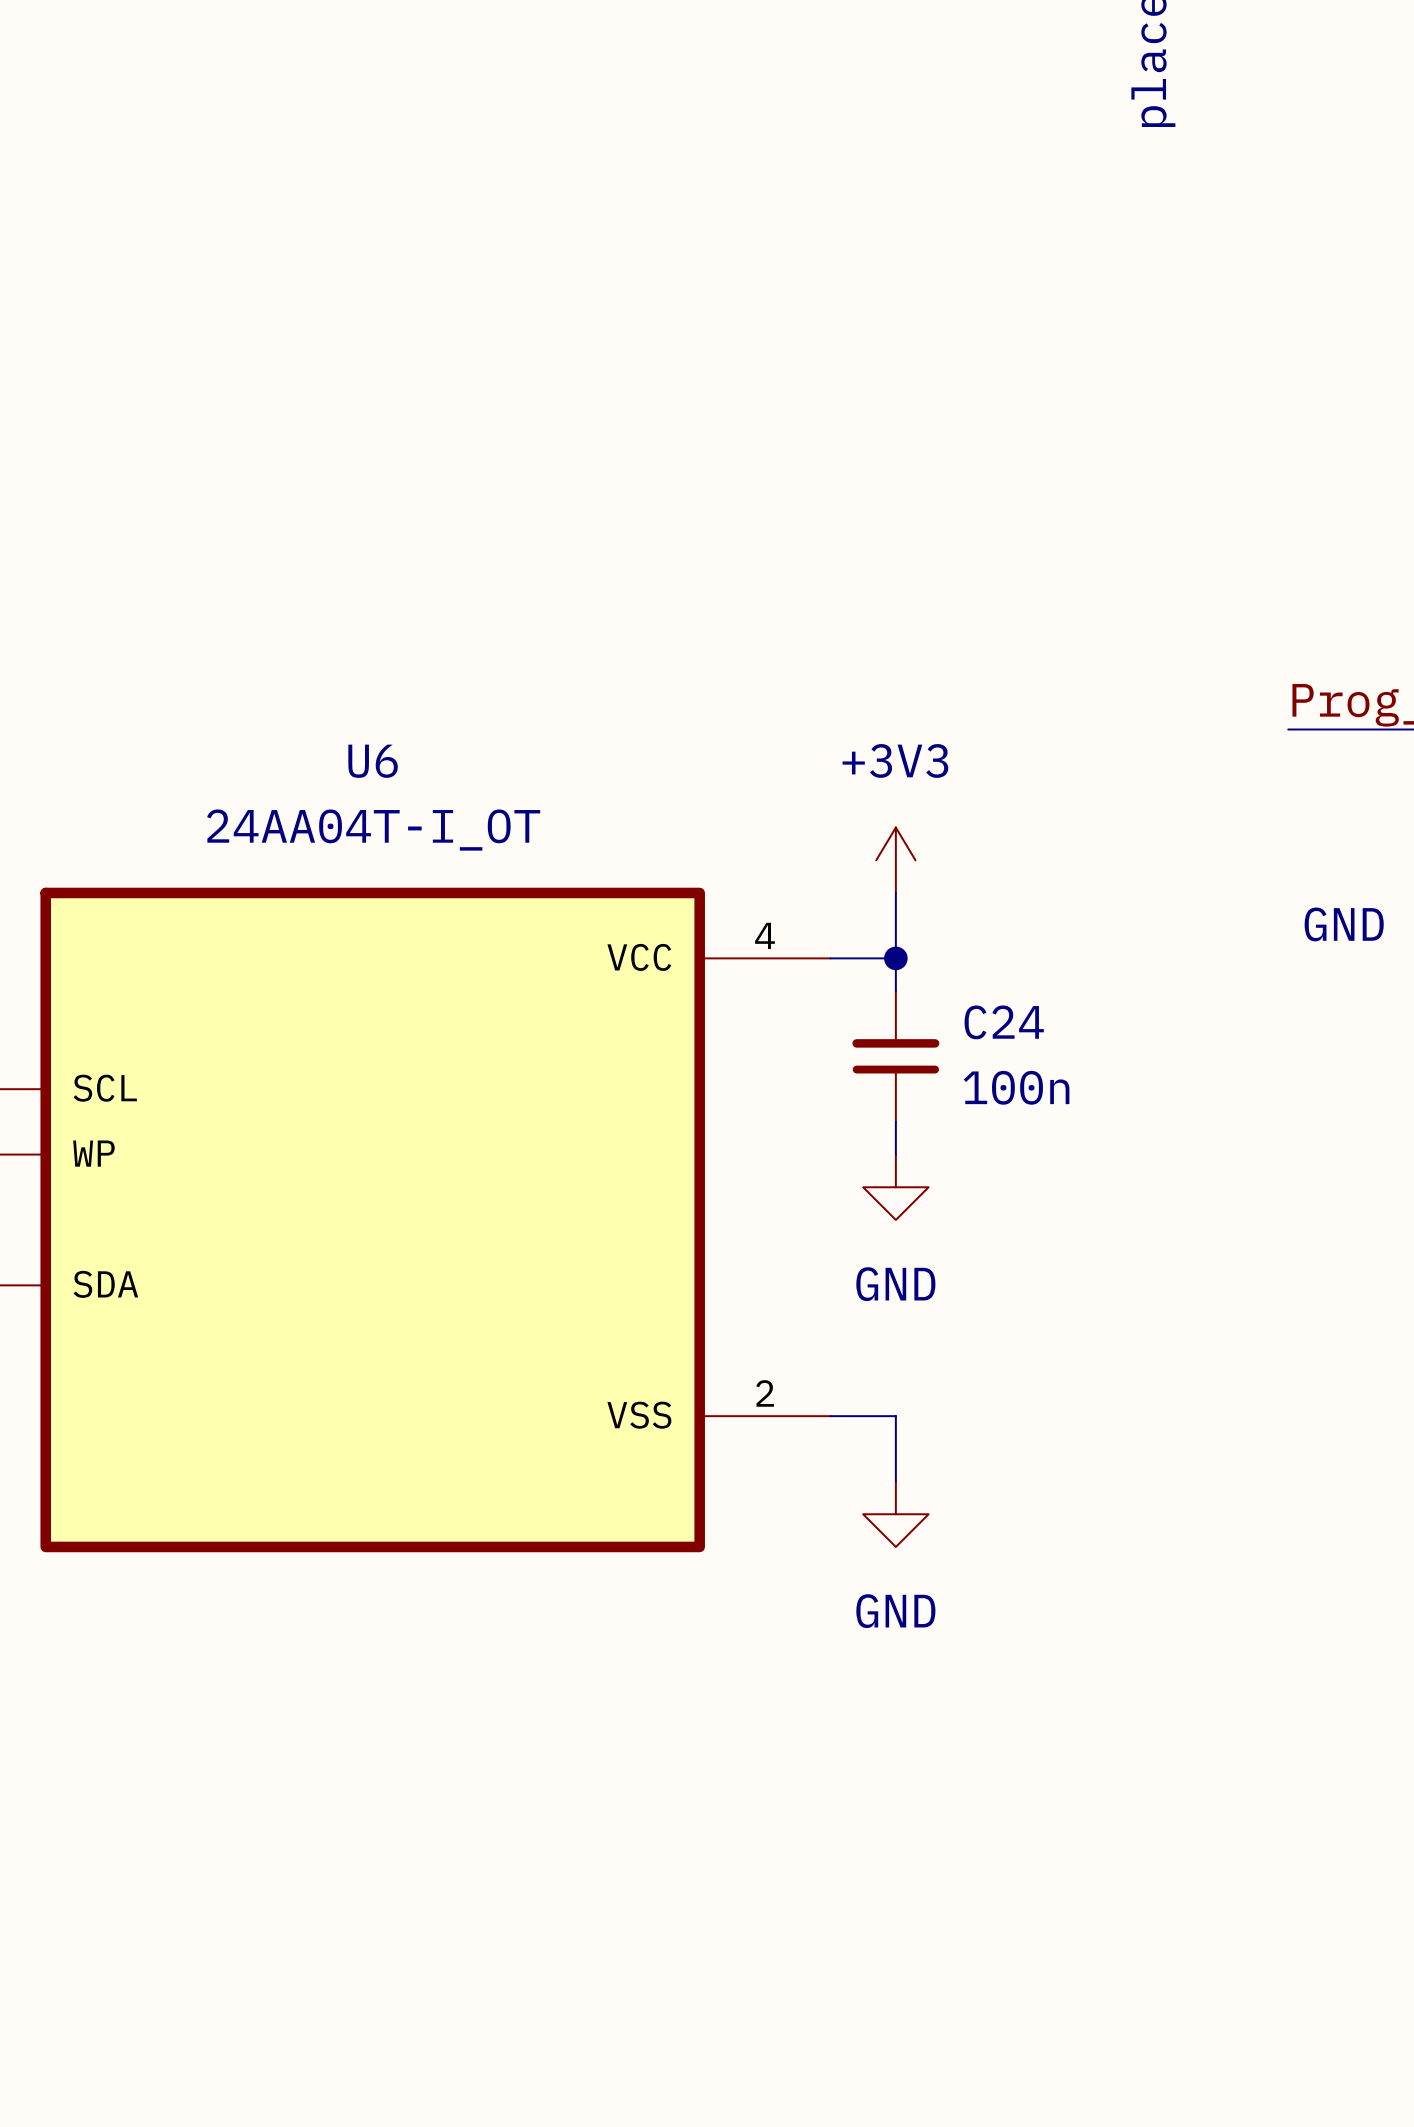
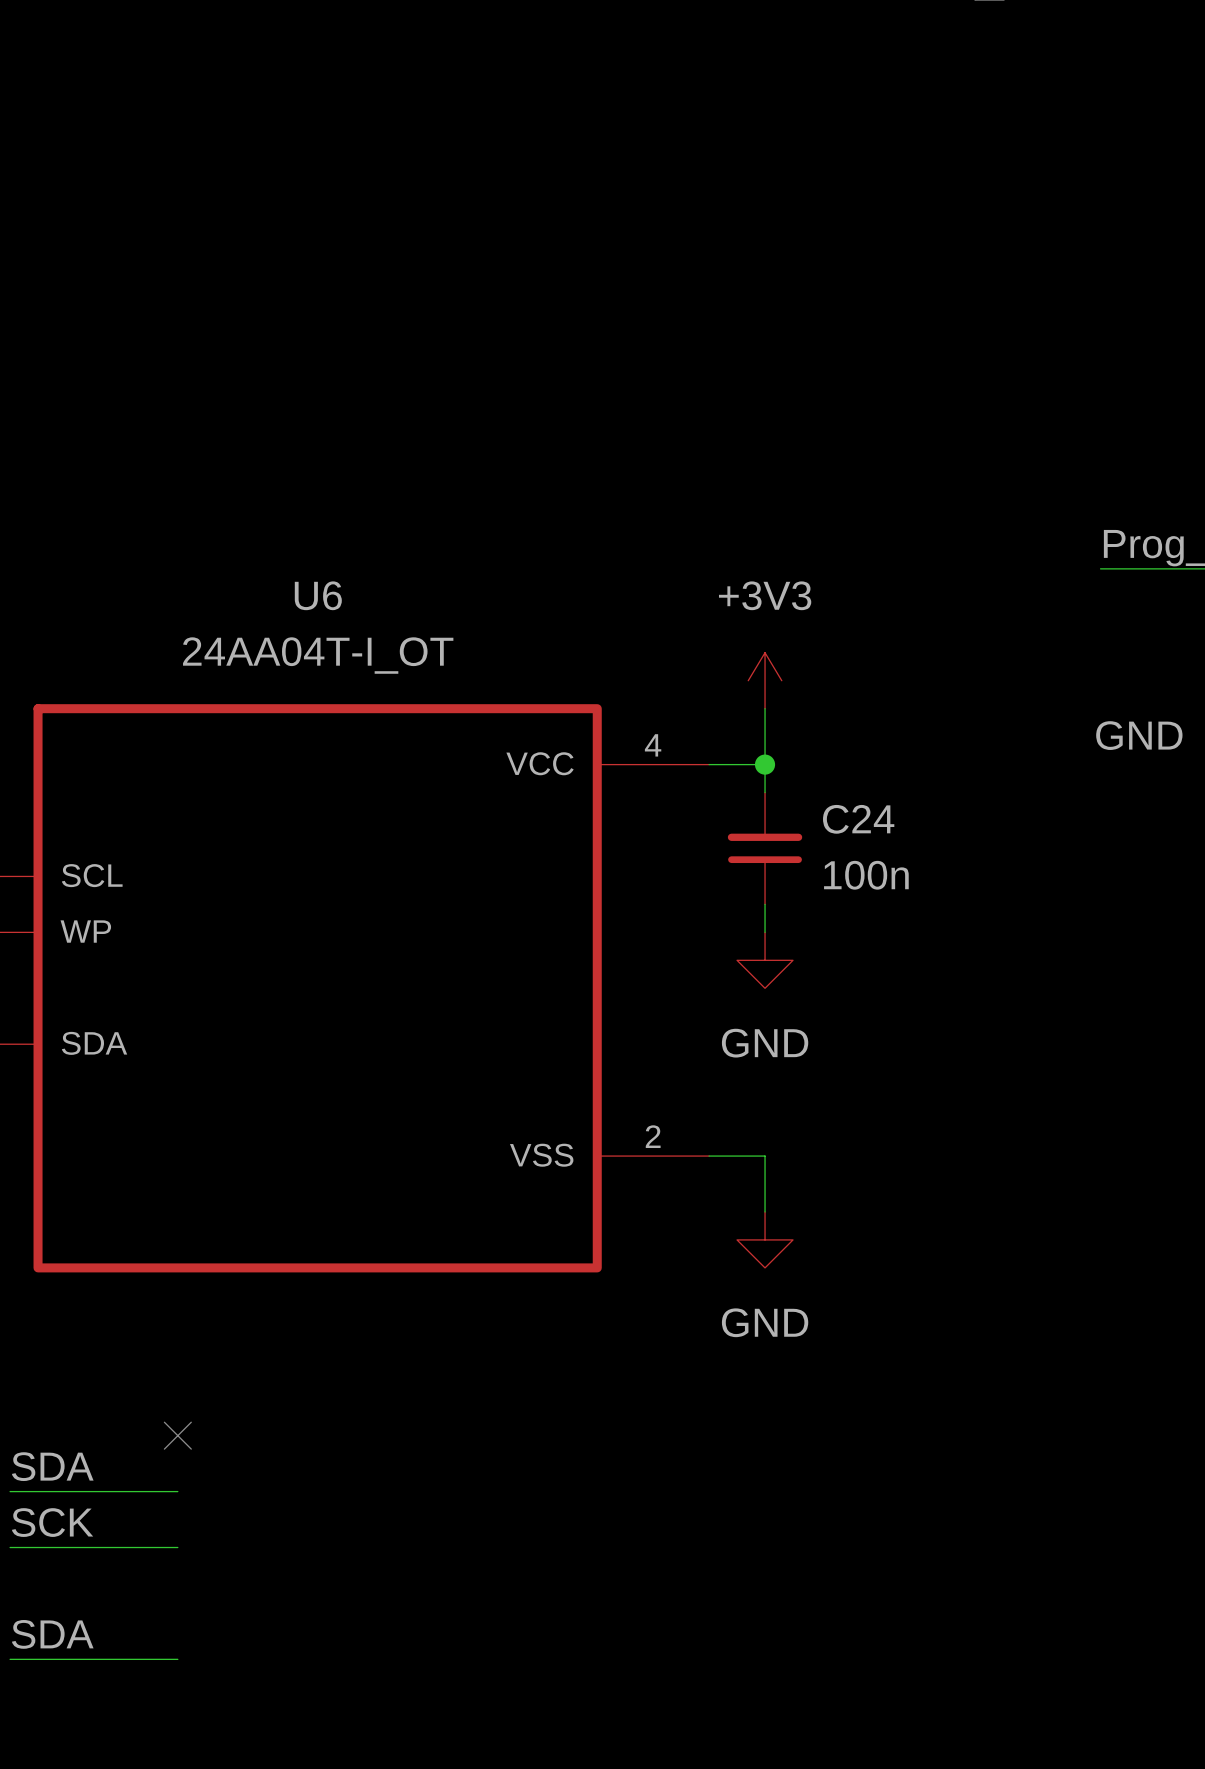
no-connect mark: none -> (177, 1435)
label: none -> SDA (52, 1466)
wire: none -> (10, 1491) (177, 1491)
label: none -> SCK (52, 1522)
wire: none -> (10, 1547) (177, 1547)
label: none -> SDA (52, 1634)
wire: none -> (10, 1659) (177, 1659)

